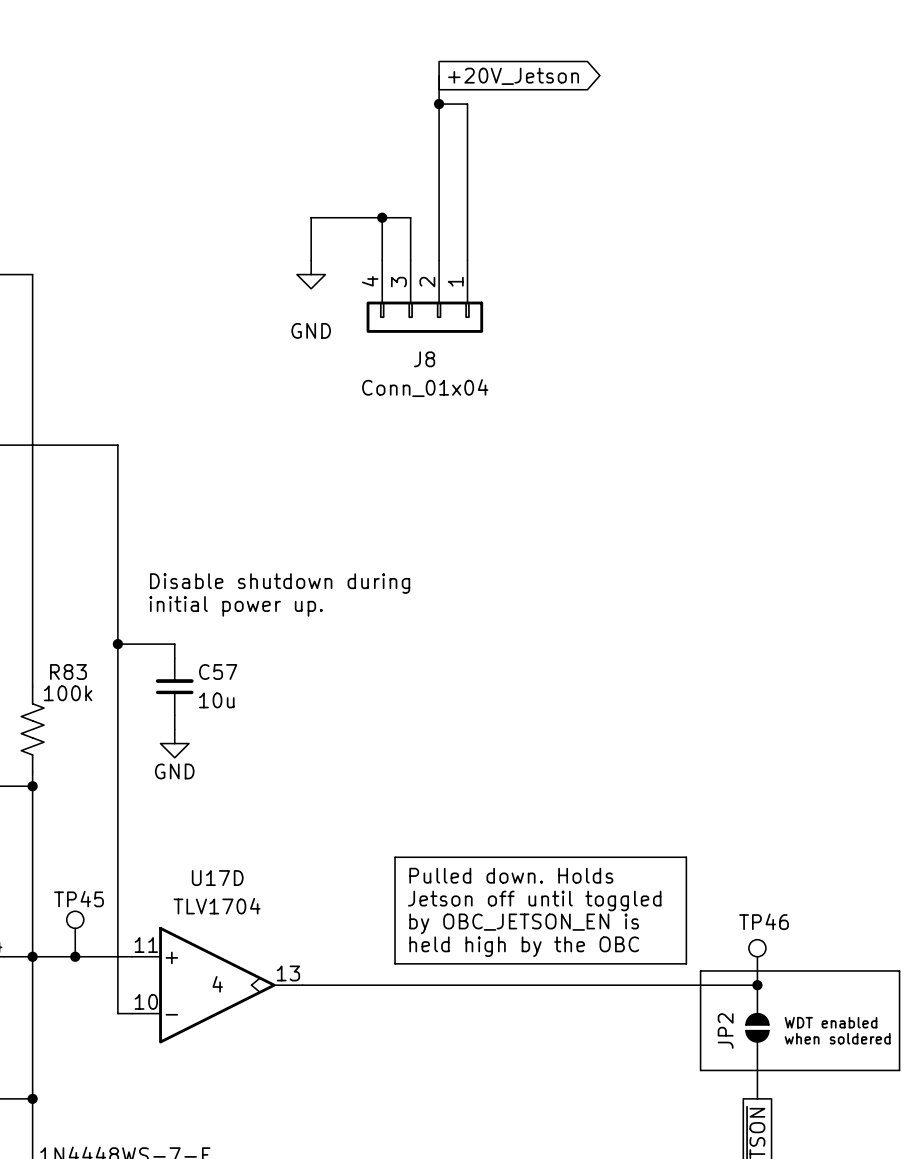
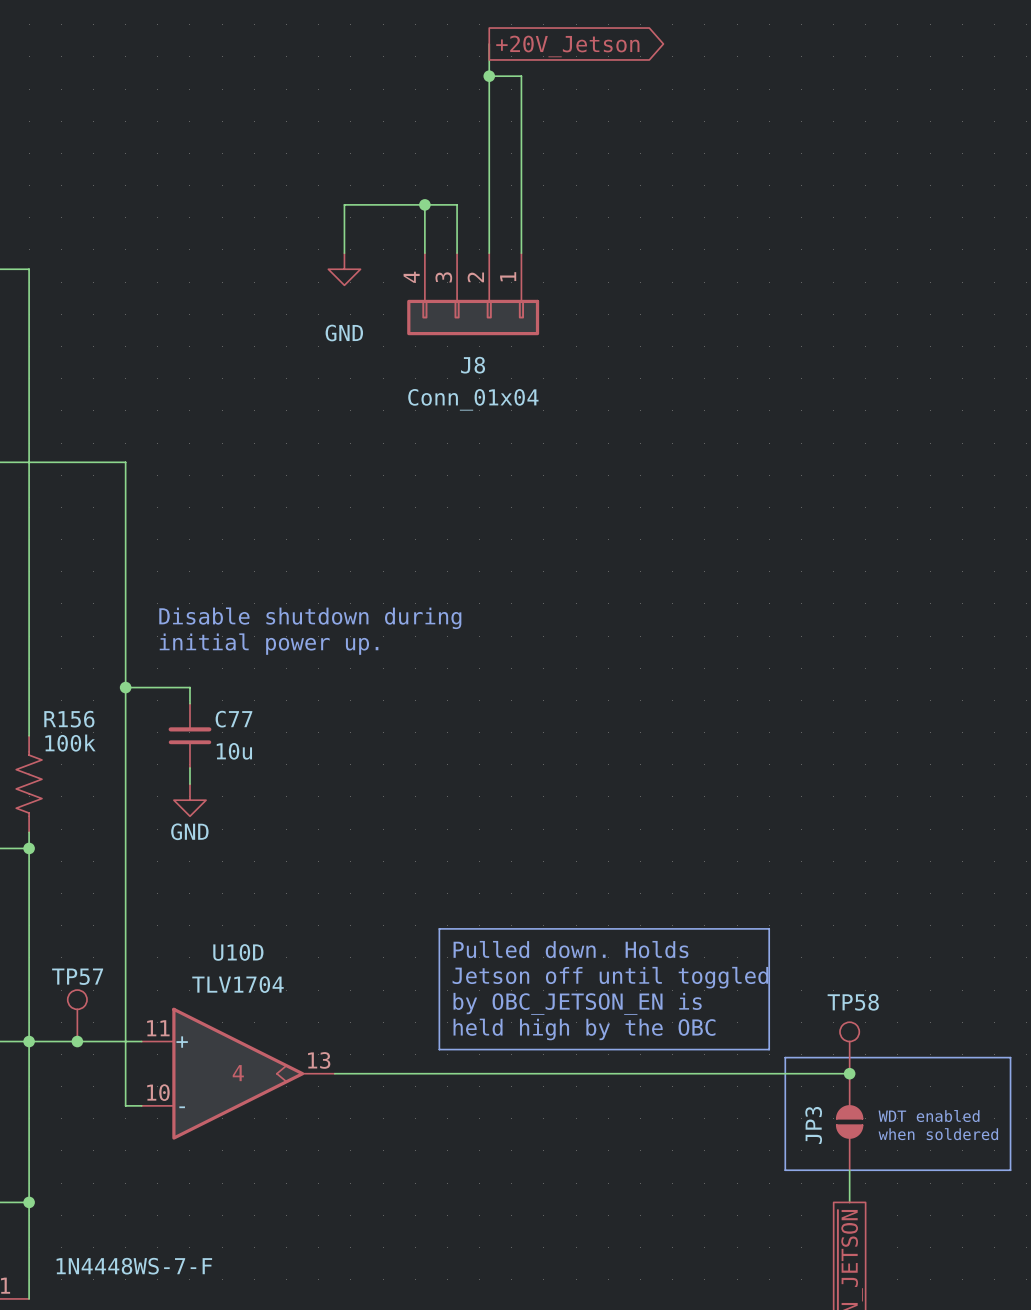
R83 name: R83 (68, 671) -> R156 (69, 719)
C57 name: C57 (218, 671) -> C77 (233, 719)
U17D name: U17D (217, 878) -> U10D (238, 952)
TP45 name: TP45 (79, 899) -> TP57 (77, 976)
TP46 name: TP46 (764, 921) -> TP58 (853, 1002)
JP2 name: JP2 (725, 1031) -> JP3 (813, 1125)

